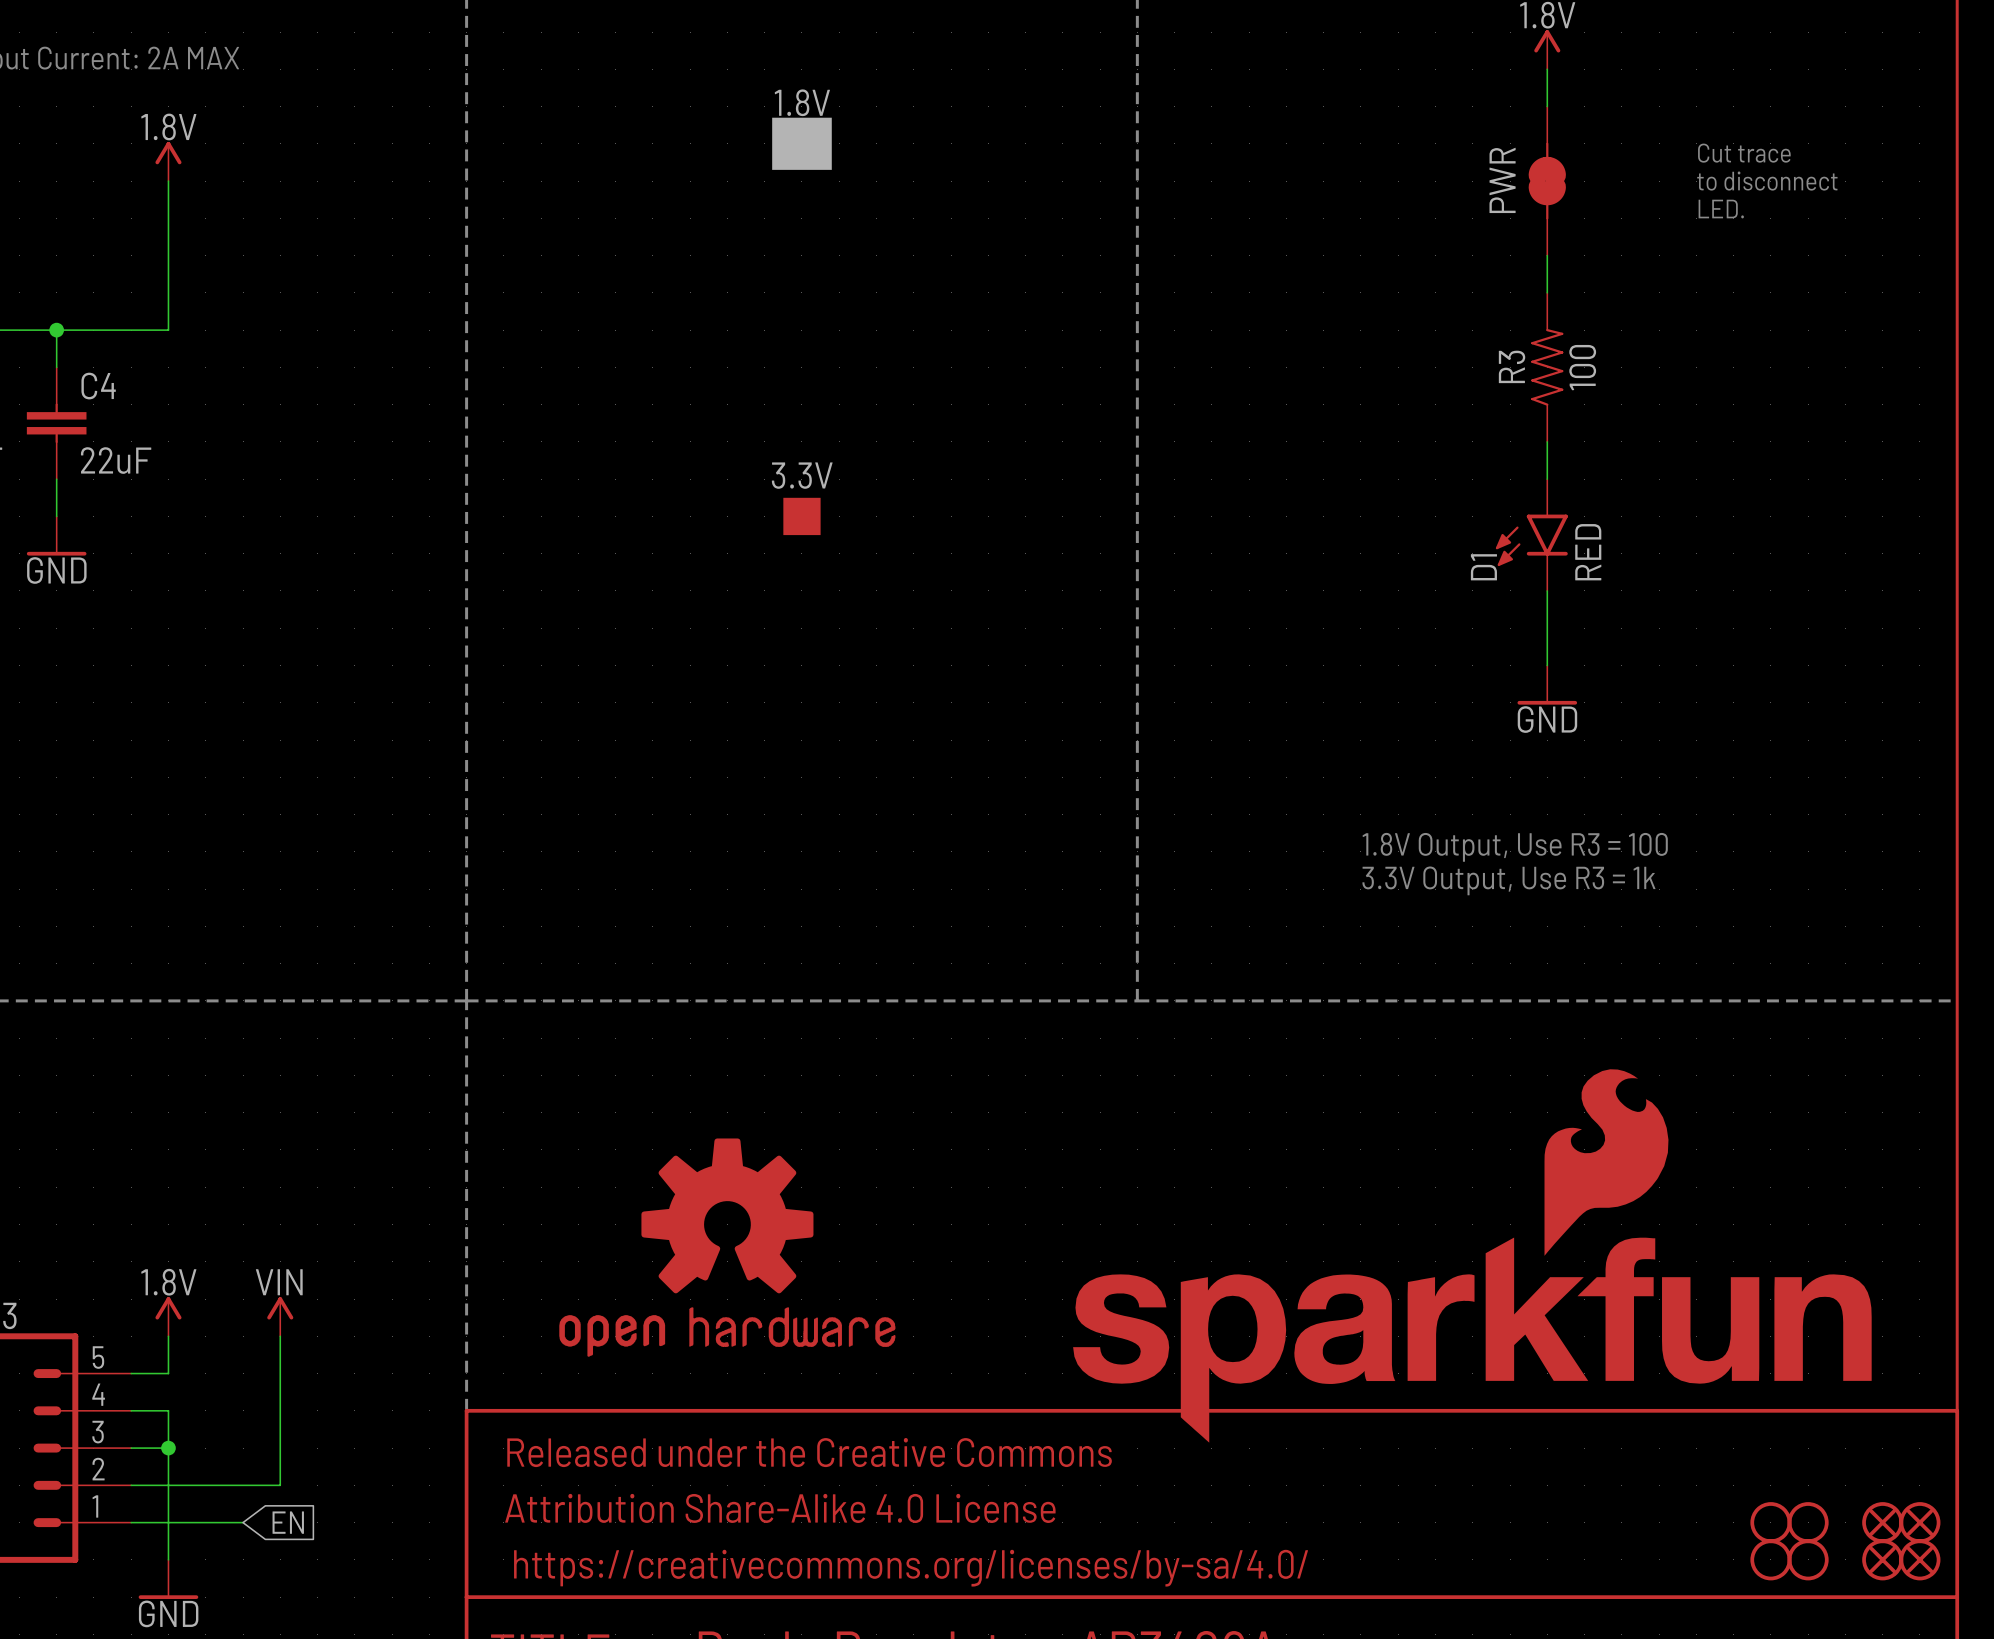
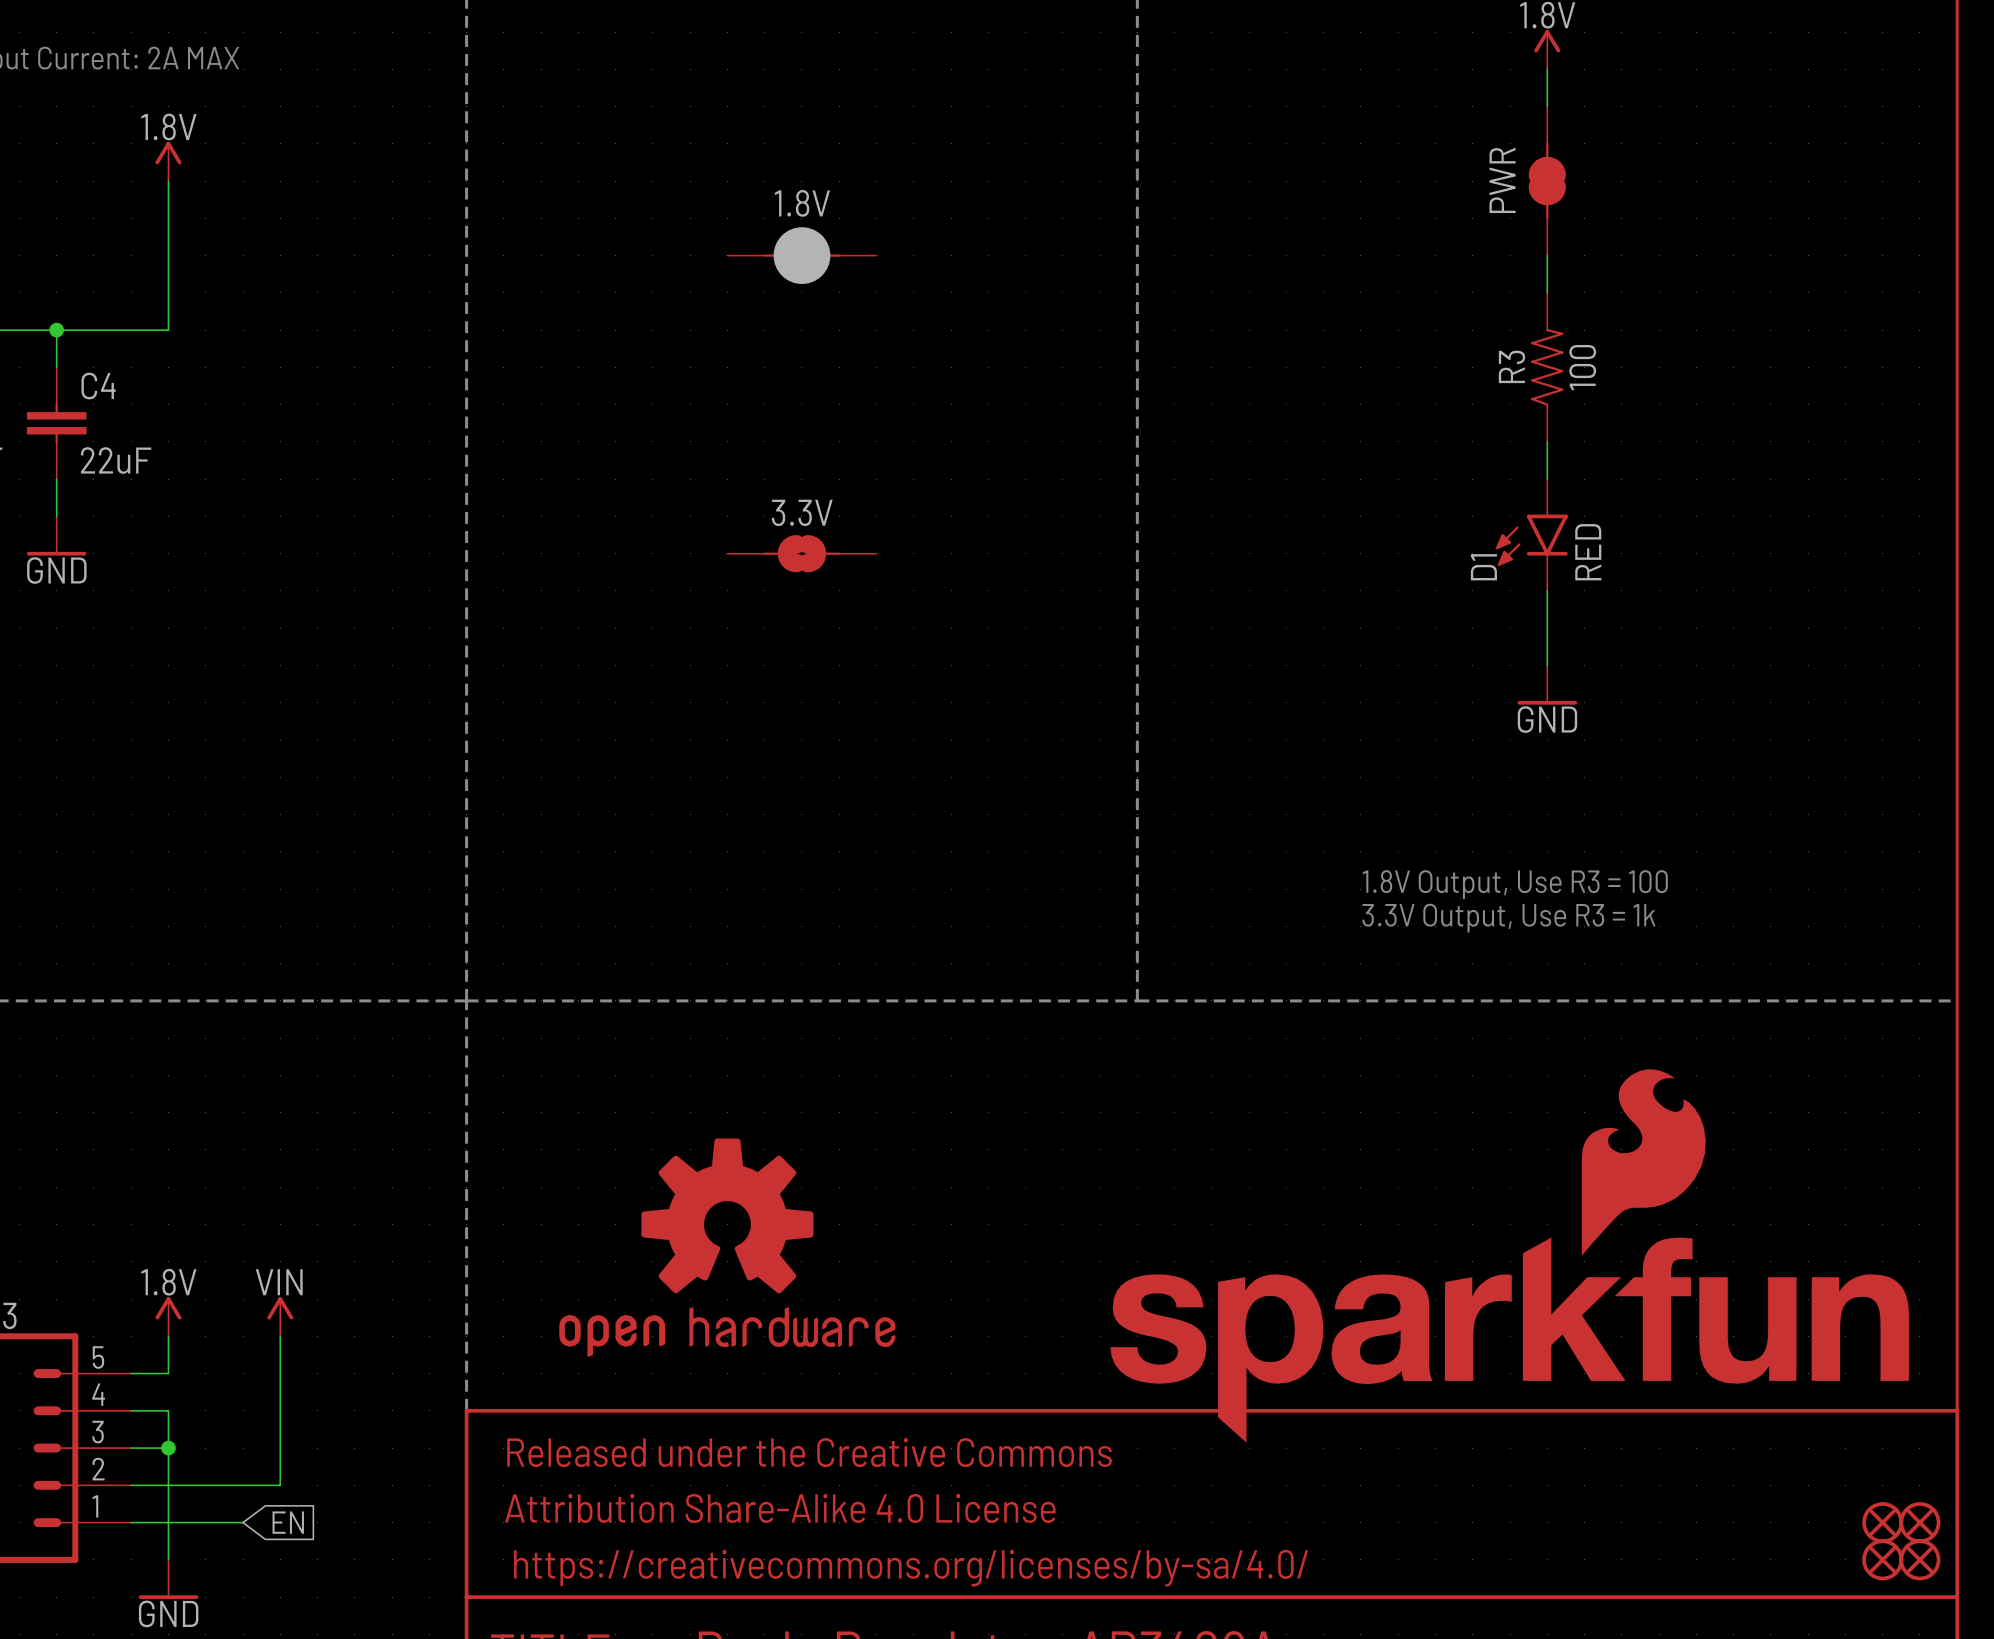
1.8V symbol: [772, 117, 832, 170] -> [727, 227, 877, 284]
text: Cut trace (1744, 153) -> none
text: to disconnect (1767, 181) -> none
text: LED. (1721, 209) -> none
3.3V symbol: [783, 497, 821, 536] -> [727, 535, 877, 573]
text position: 1.8V Output, Use R3 = 100 (1515, 847) -> 1.8V Output, Use R3 = 100 (1515, 884)
text position: 3.3V Output, Use R3 = 1k (1508, 880) -> 3.3V Output, Use R3 = 1k (1508, 918)
part position: (1472, 1255) -> (1509, 1255)
part: (1770, 1522) -> none
part: (1808, 1522) -> none
part: (1770, 1559) -> none
part: (1808, 1559) -> none

